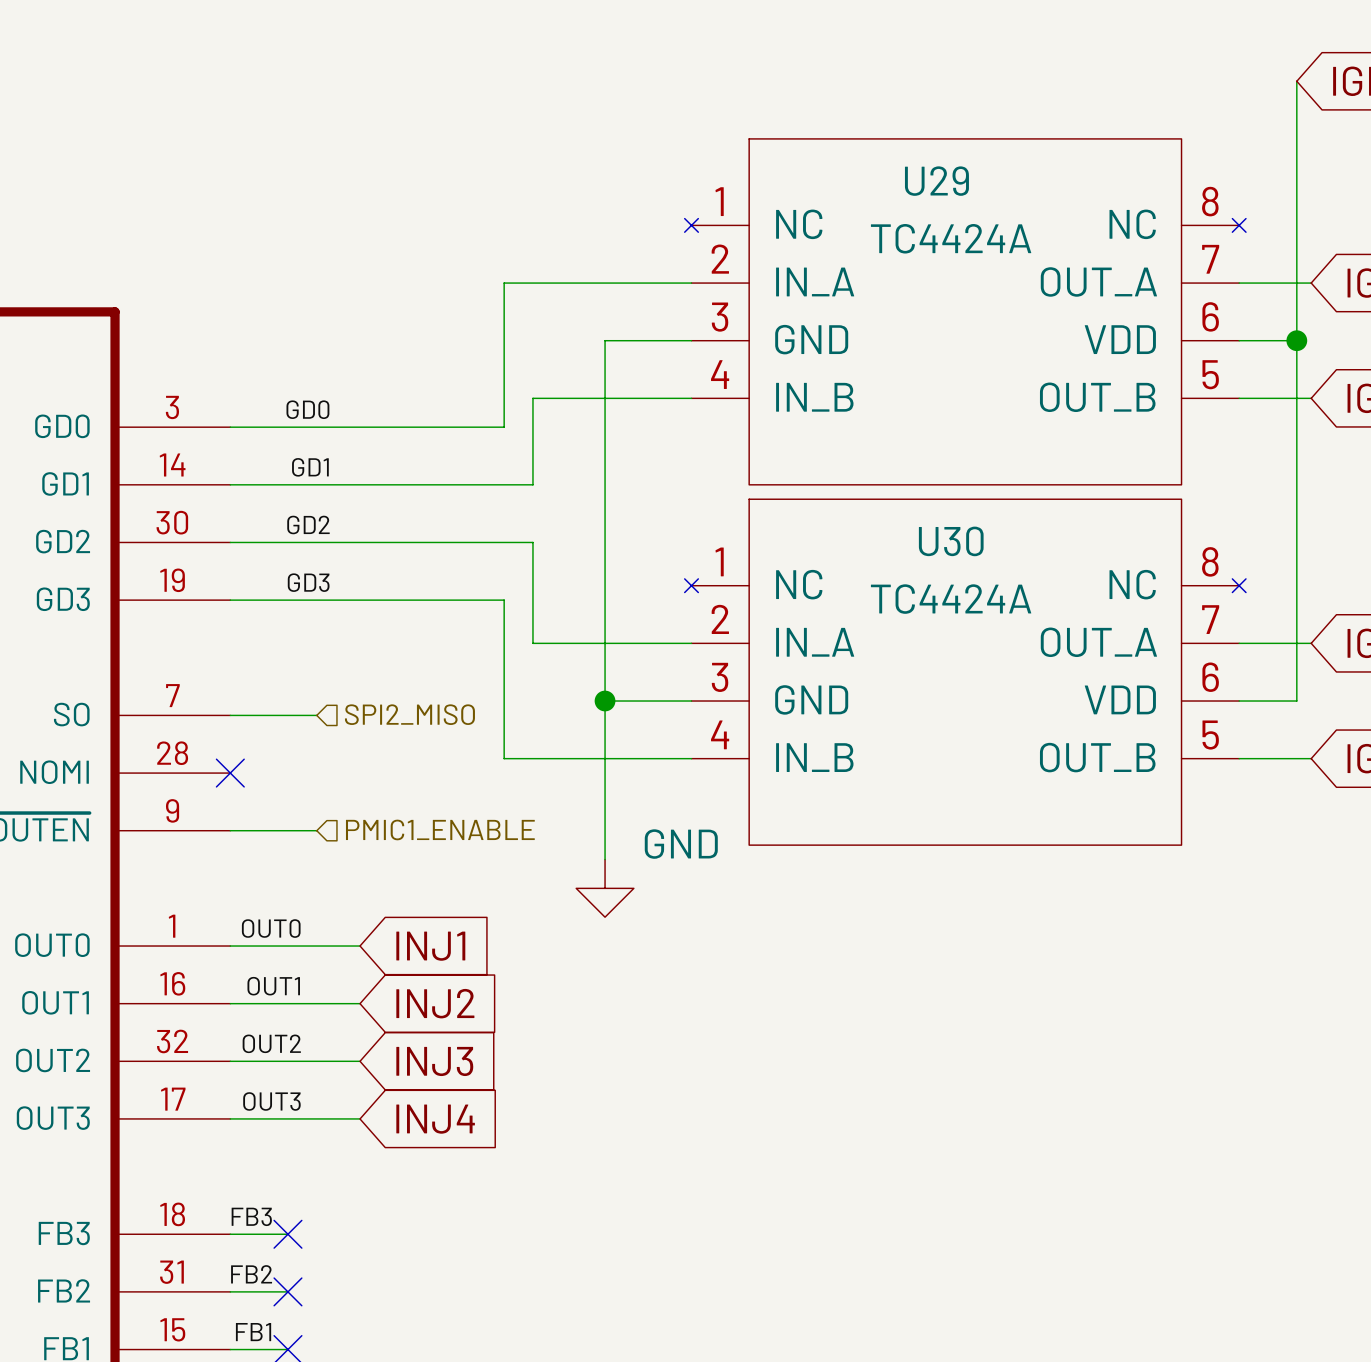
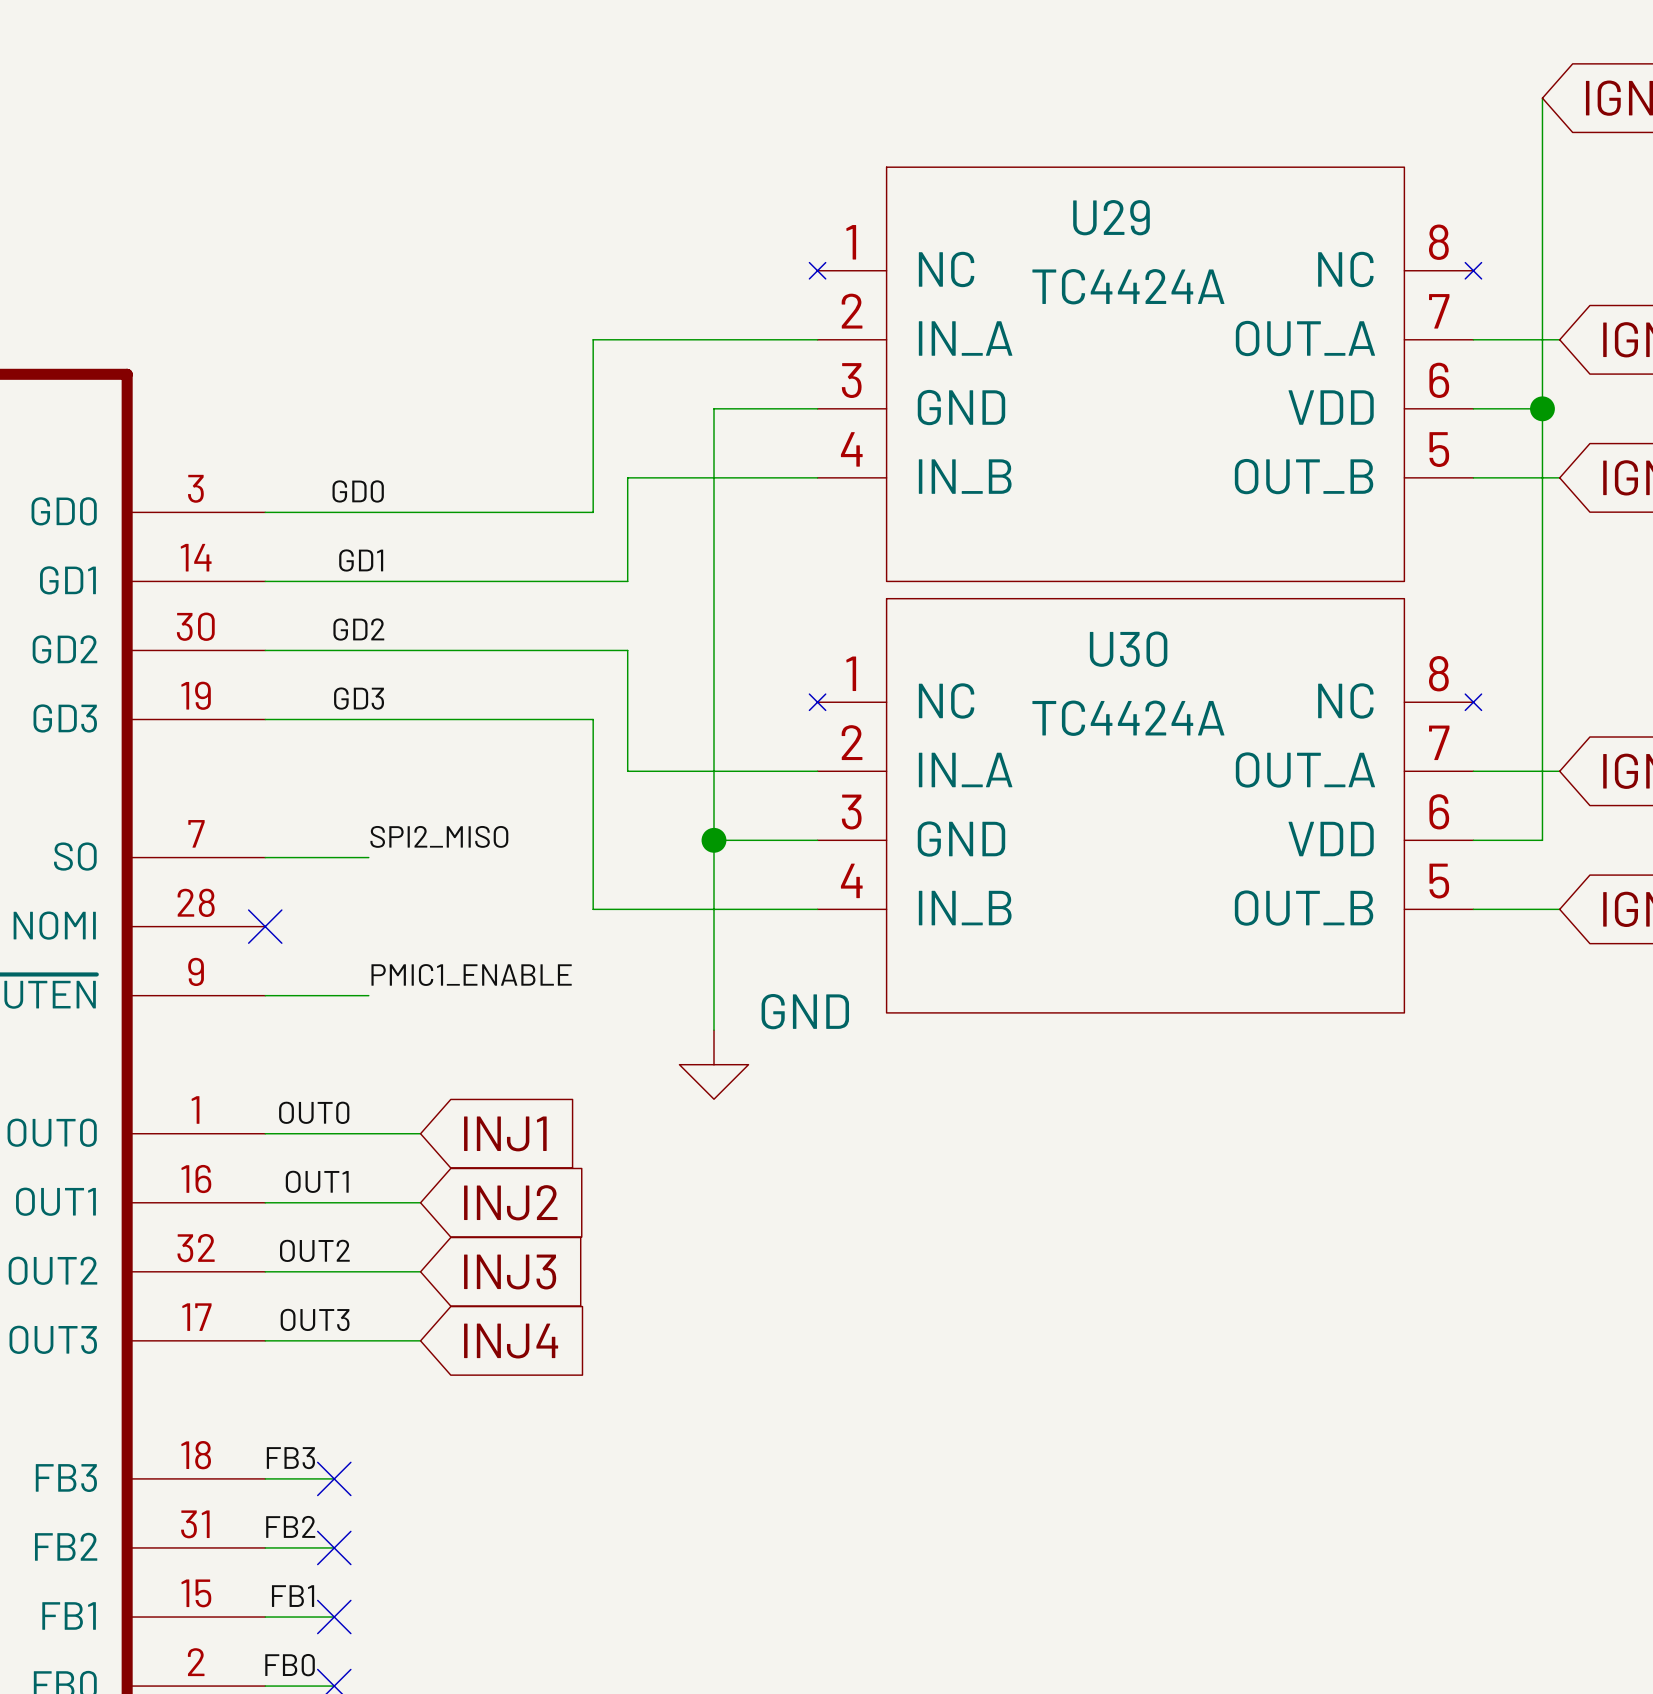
label: none -> SPI2_MISO (439, 836)
hierarchical label: SPI2_MISO (409, 714) -> none
label: none -> PMIC1_ENABLE (471, 975)
hierarchical label: PMIC1_ENABLE (440, 829) -> none

